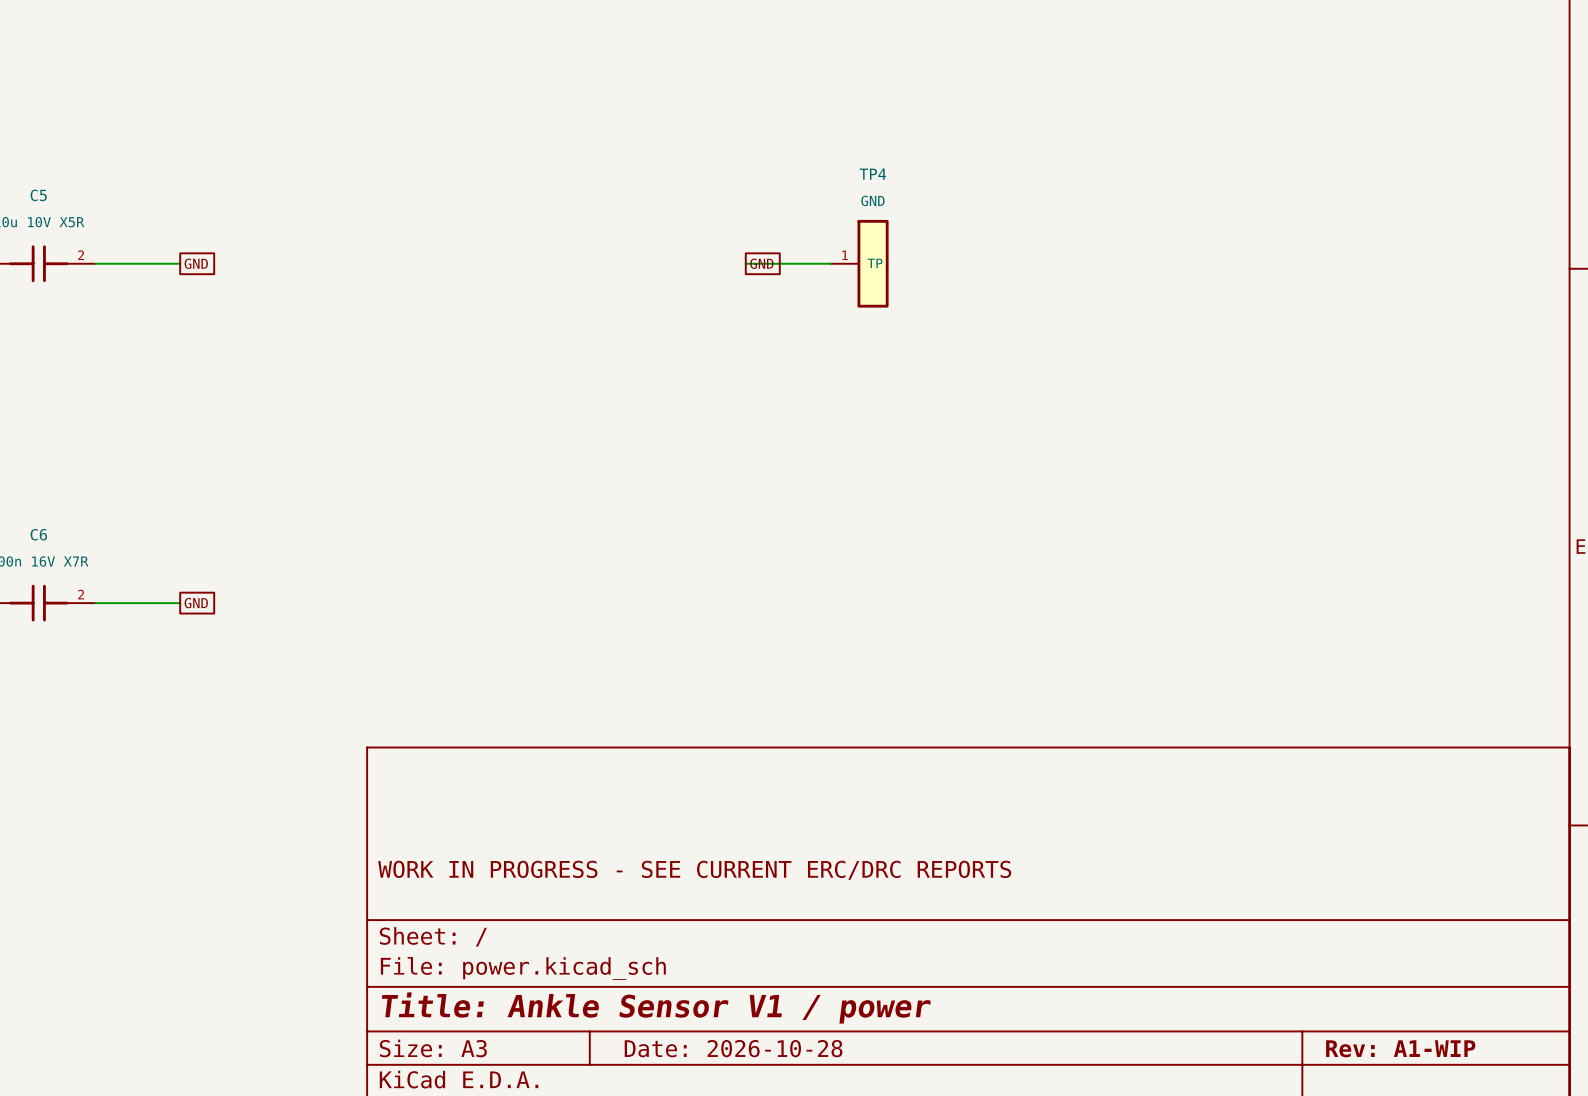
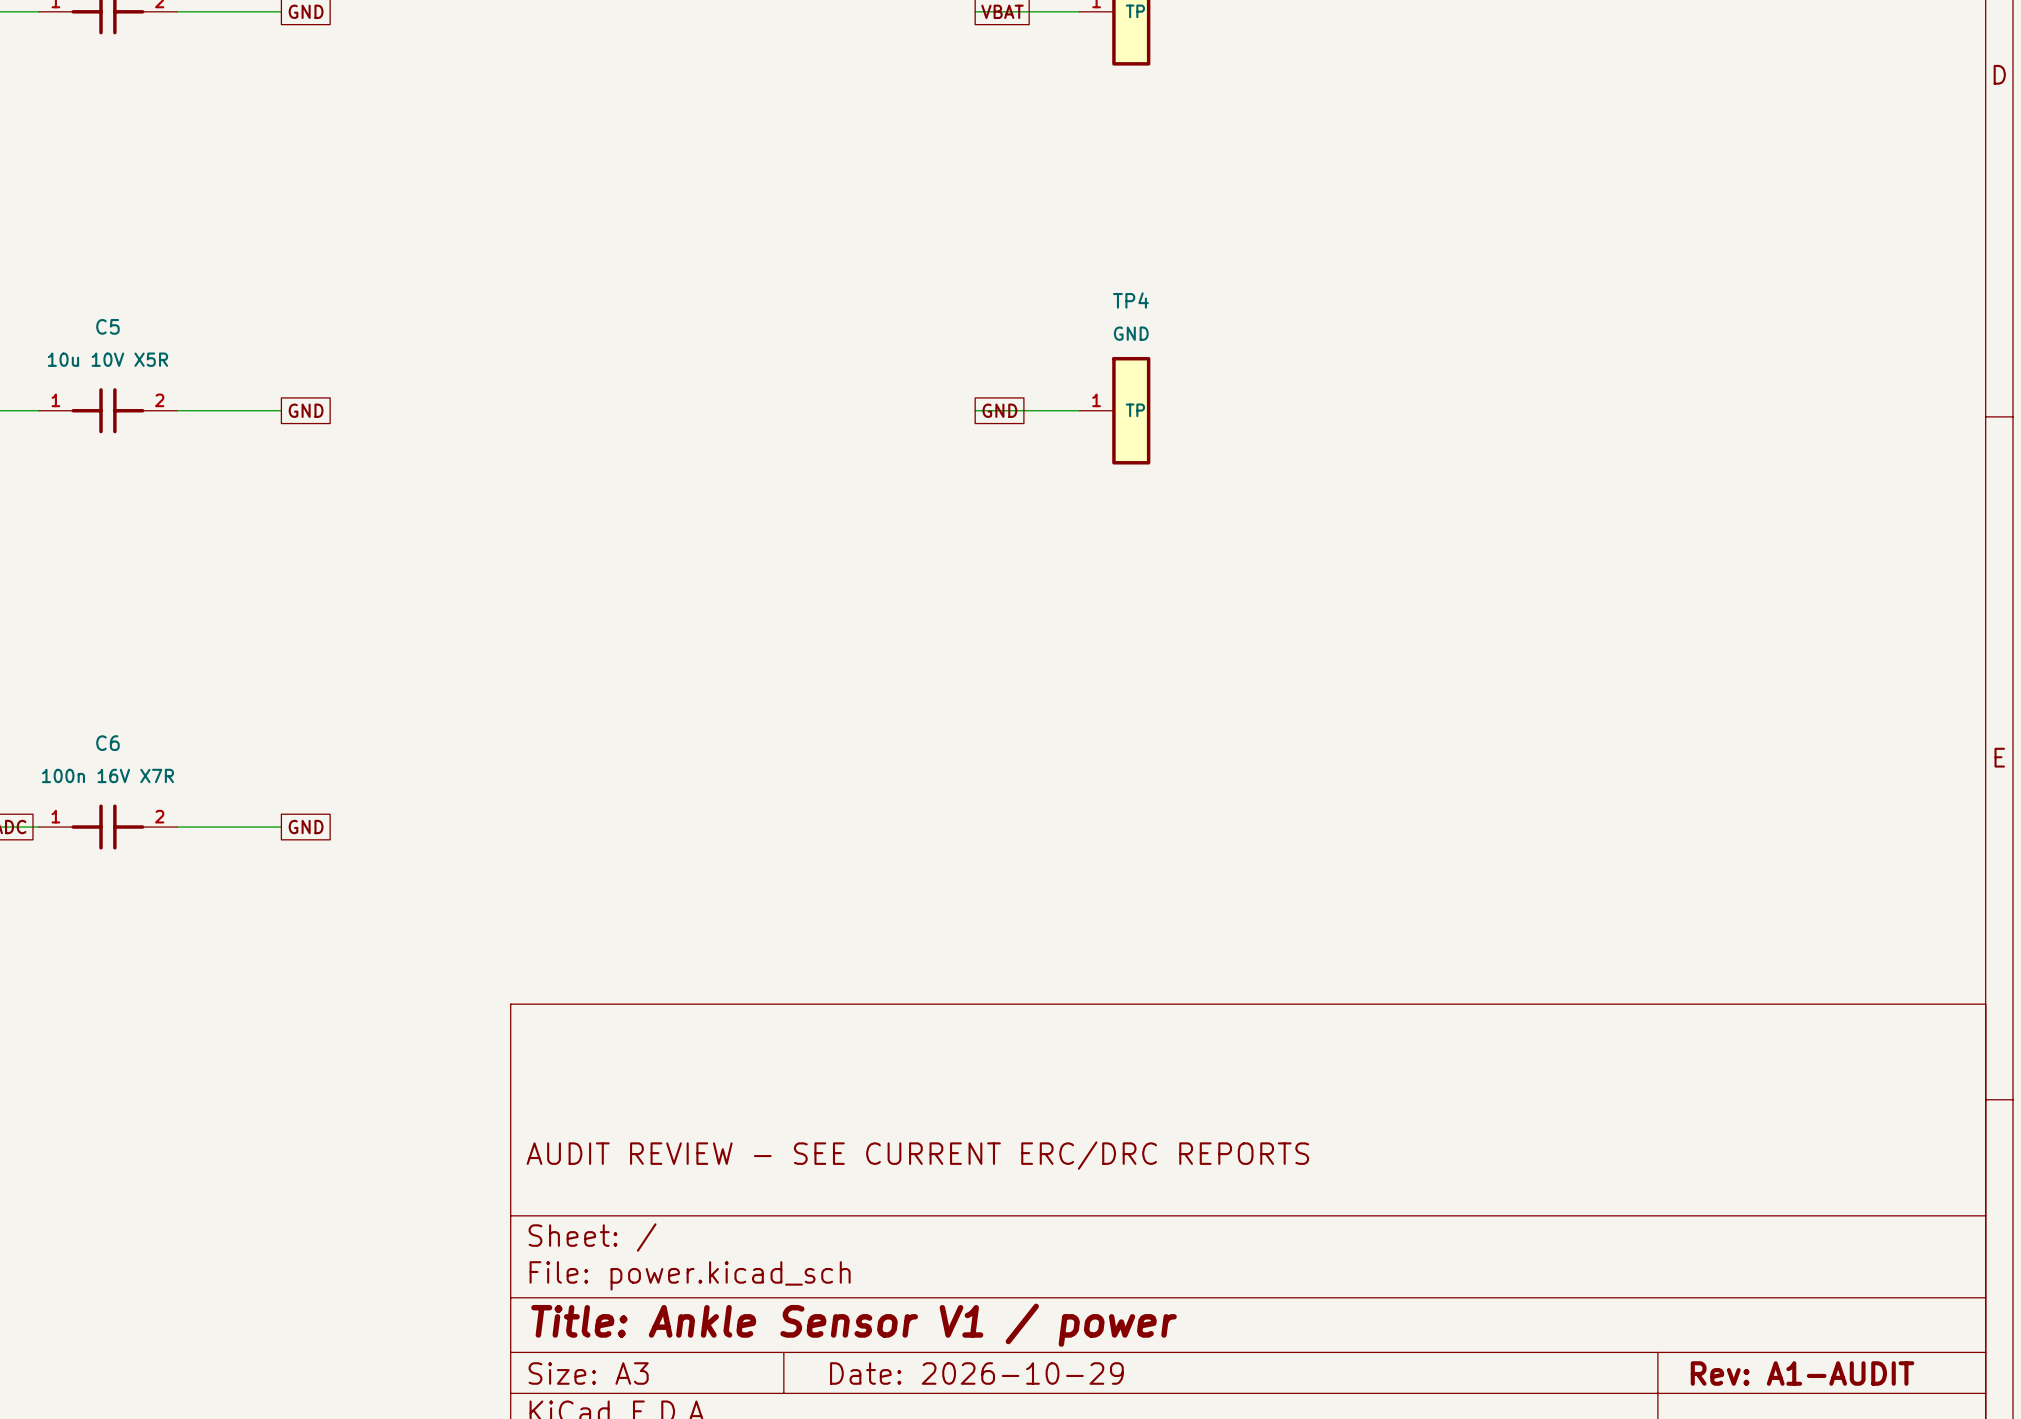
title block: WORK IN PROGRESS - SEE CURRENT ERC/DRC REPORTS (694, 870) -> AUDIT REVIEW - SEE CURRENT ERC/DRC REPORTS (917, 1155)
title block: Date: 2026-10-28 (733, 1048) -> Date: 2026-10-29 (976, 1373)
title block: Rev: A1-WIP (1400, 1048) -> Rev: A1-AUDIT (1802, 1373)

